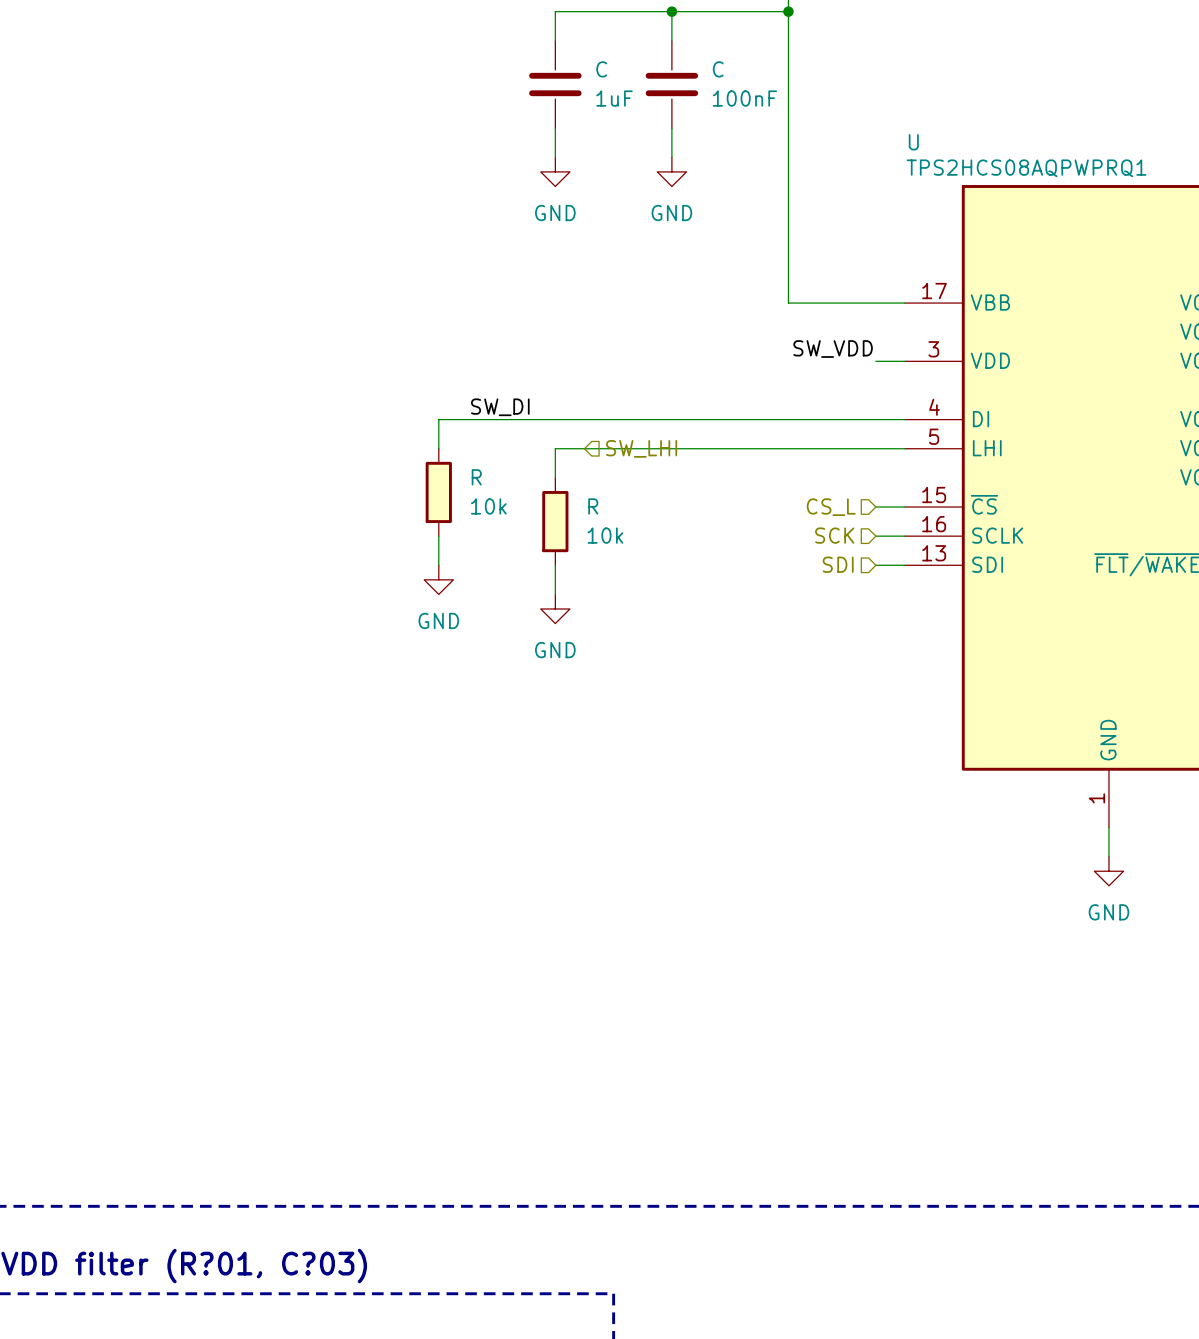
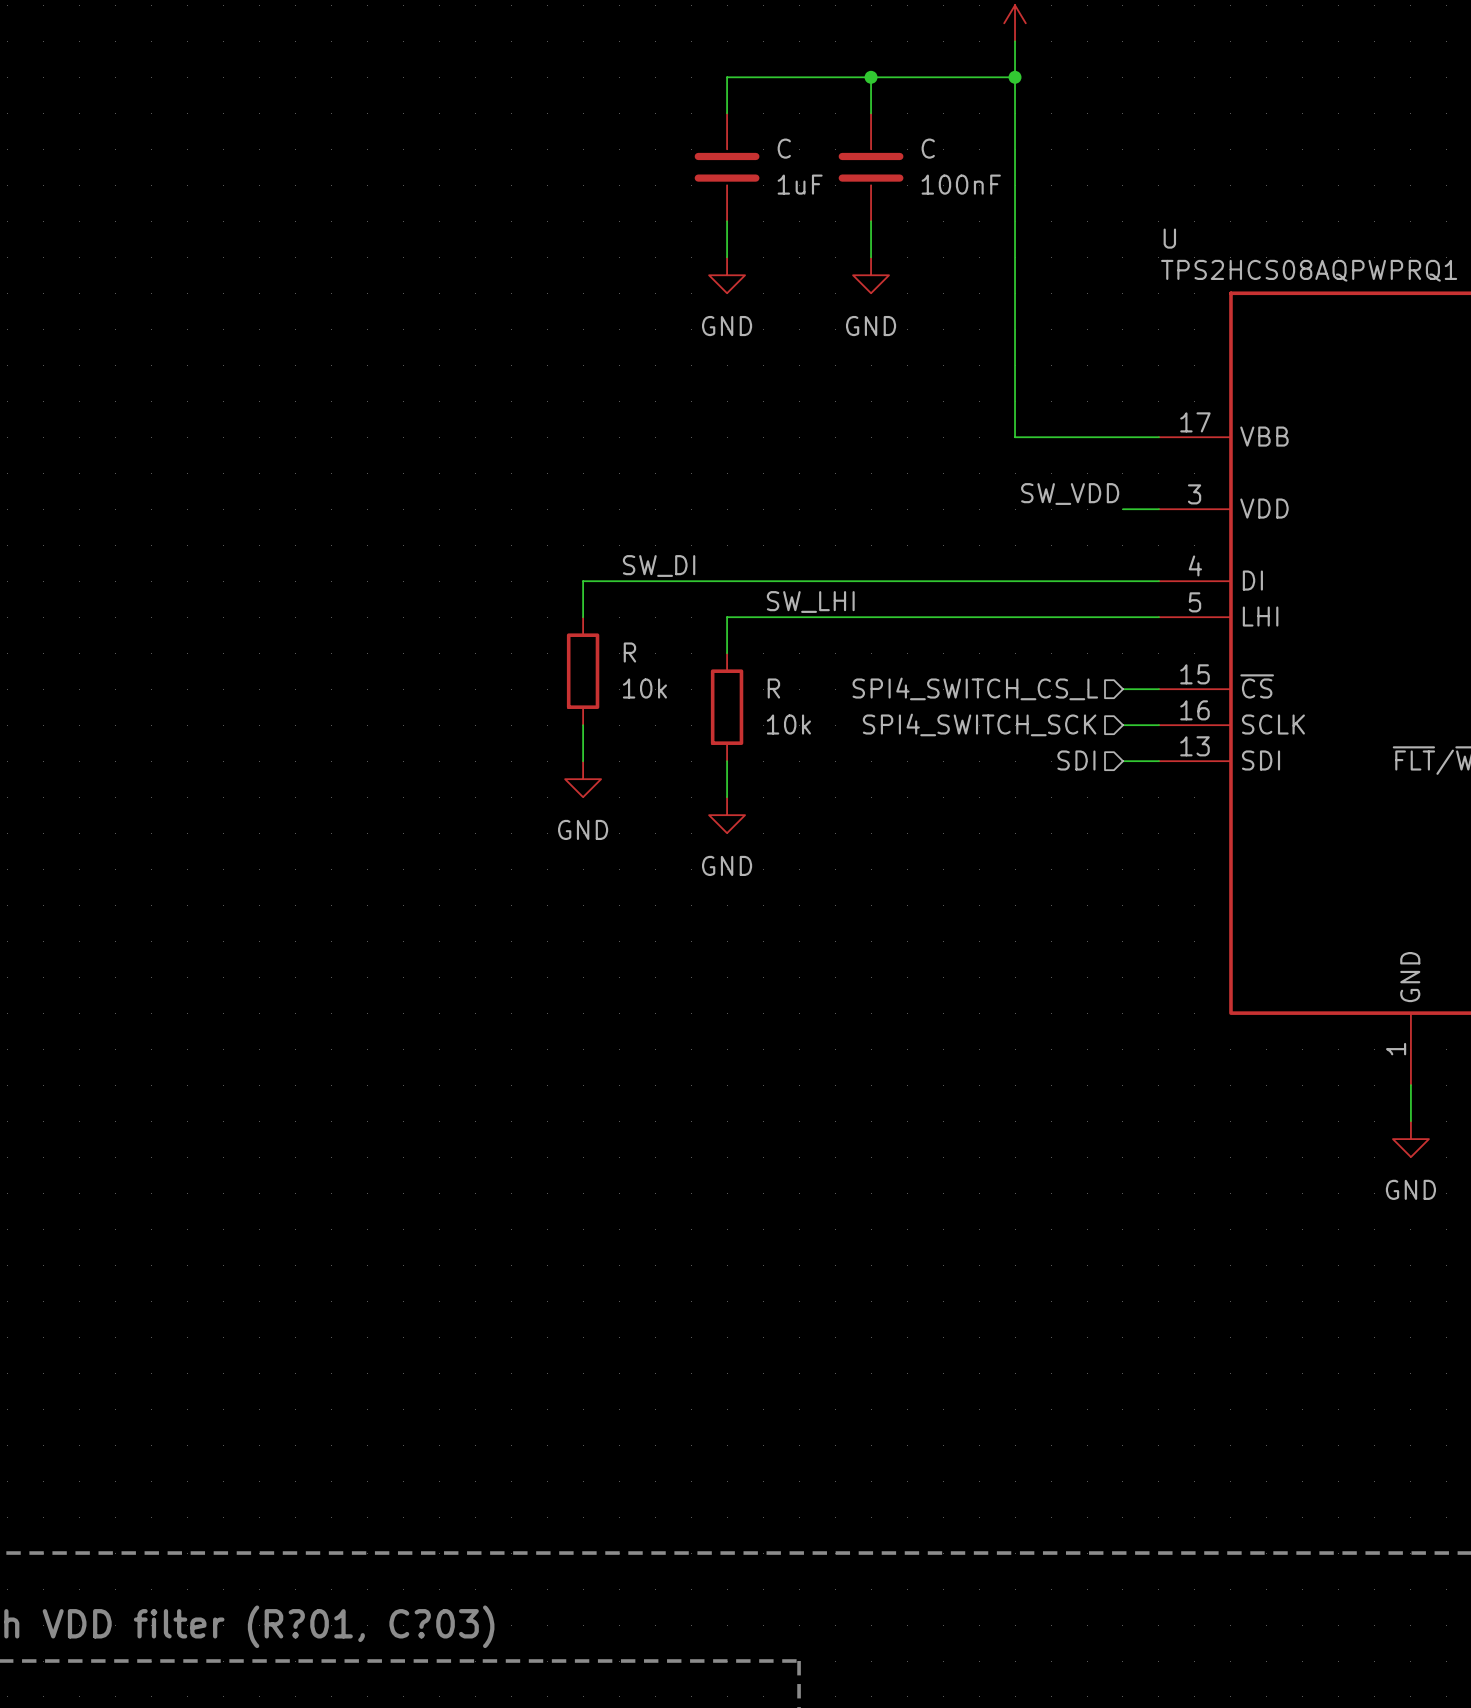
label: none -> SW_LHI (810, 601)
hierarchical label: SW_LHI (641, 448) -> none
hierarchical label: CS_L (831, 507) -> SPI4_SWITCH_CS_L (975, 688)
hierarchical label: SCK (834, 535) -> SPI4_SWITCH_SCK (979, 724)

